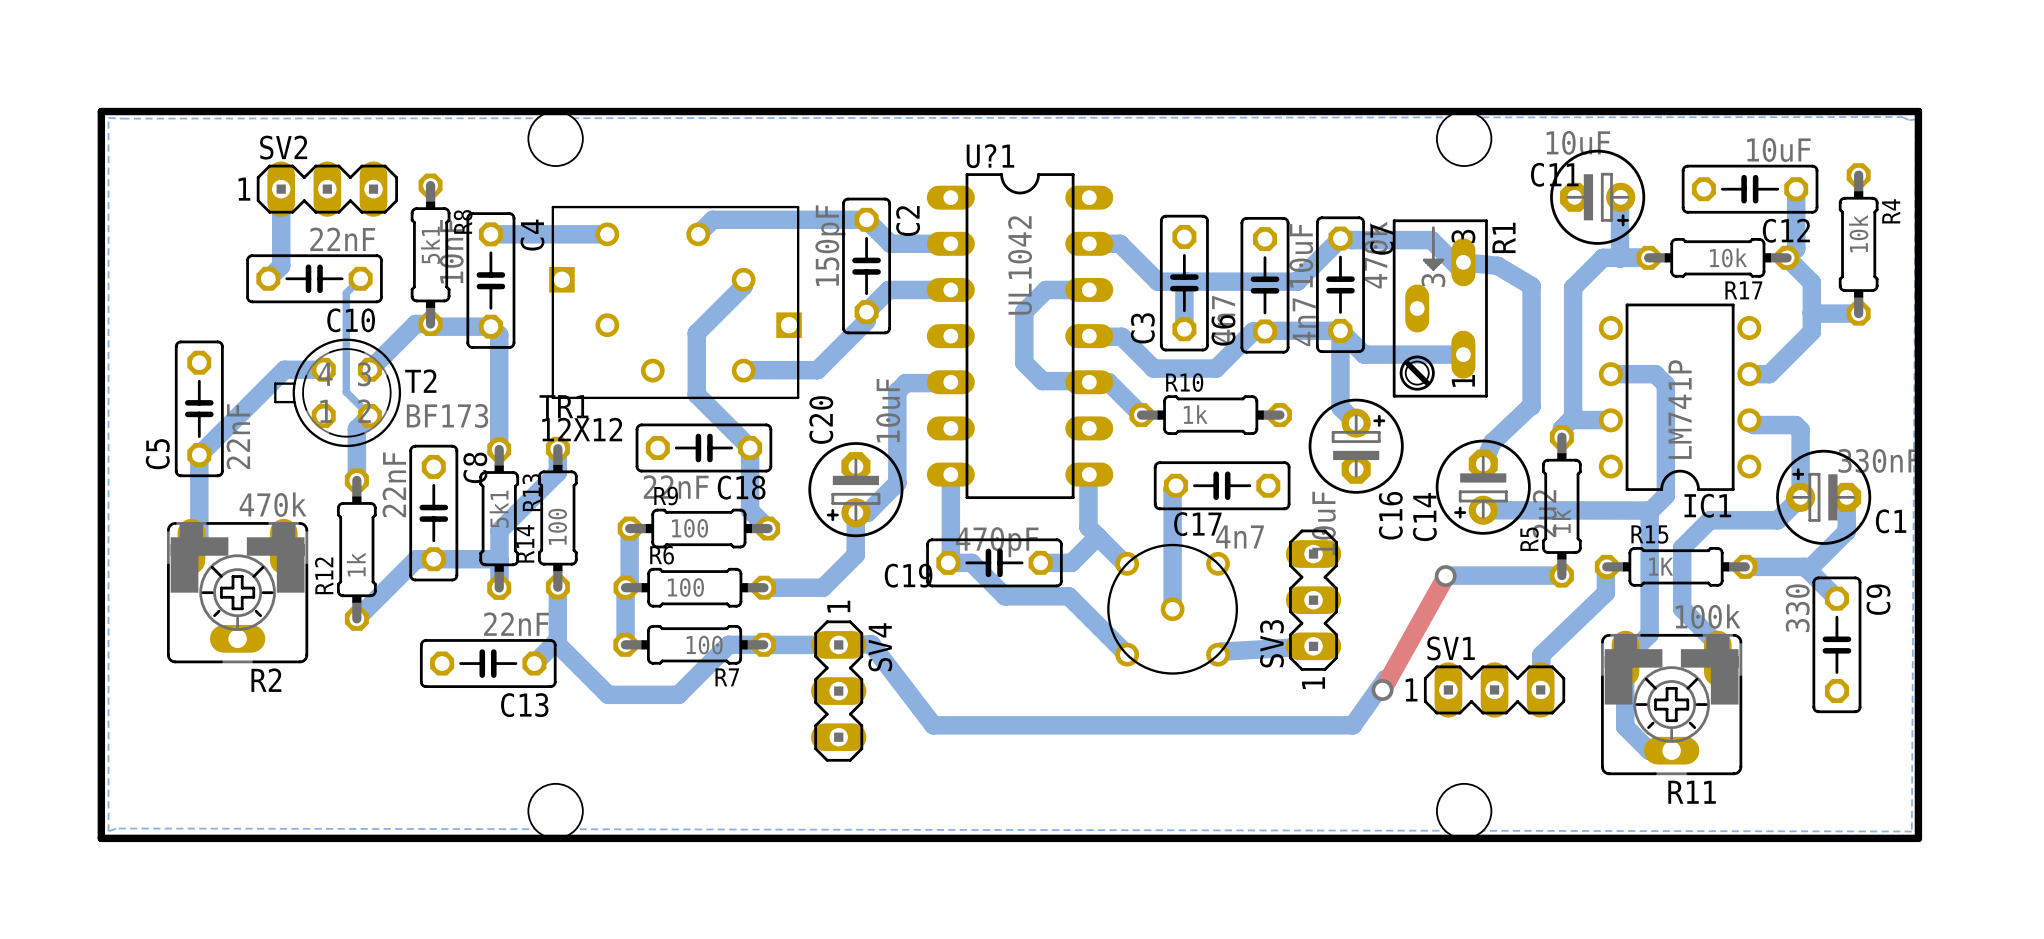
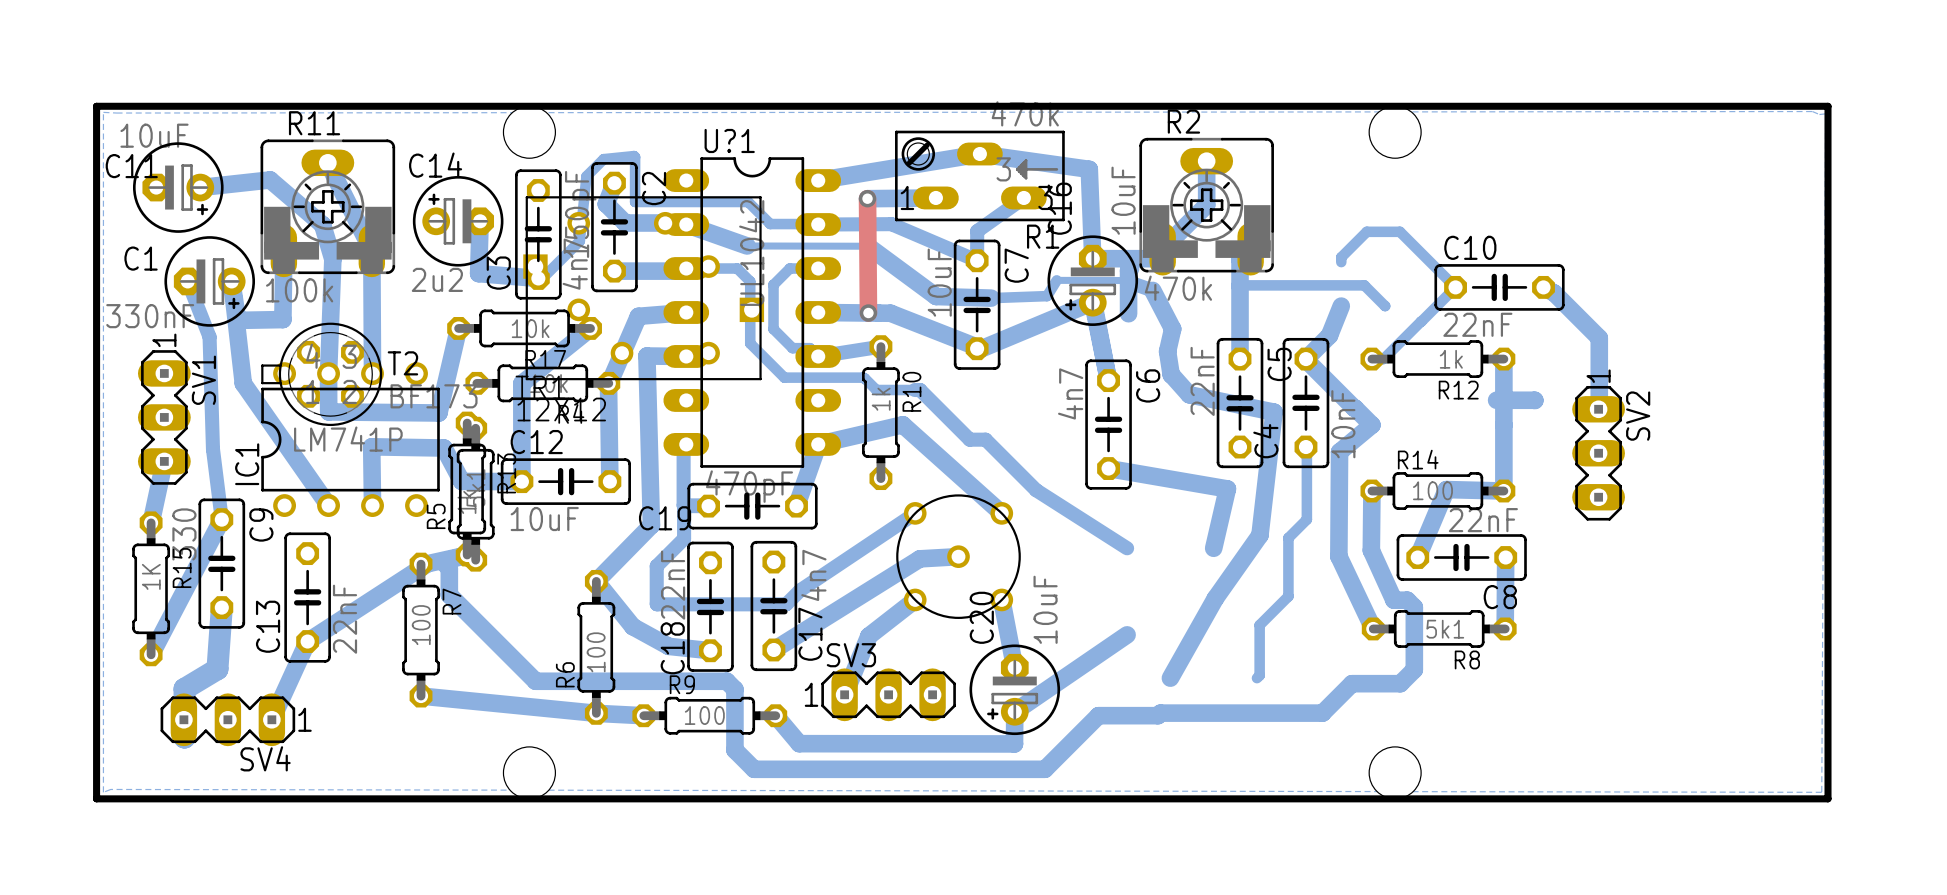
SV2 name position: SV2 (283, 147) -> SV2 (1638, 416)
SV2 footprint: [256, 161, 398, 217] -> [1572, 385, 1625, 521]
bottom track: none -> (1206, 161) (1206, 205) (1153, 258) (1092, 258) (1089, 169) (979, 153) (818, 180)
bottom track: none -> (327, 162) (371, 250) (372, 373)
bottom track: (281, 189) (281, 265) (268, 278) -> none
C12 rotation: 0° (1750, 189) -> 180° (565, 481)
C12 position: (1750, 189) -> (565, 481)
bottom track: (1796, 189) (1796, 248) (1787, 257) (1811, 282) (1811, 331) (1769, 374) (1749, 374) -> none
bottom track: none -> (614, 183) (606, 204) (625, 223) (684, 223) (747, 245) (868, 246) (936, 296) (991, 298) (1047, 296) (1056, 280) (1131, 282) (1152, 290) (1172, 328) (1167, 351) (1171, 374)
bottom track: none -> (200, 187) (270, 179) (322, 224) (332, 259) (328, 411) (438, 413) (458, 328)
C11 position: (1597, 197) -> (178, 187)
bottom track: (1620, 197) (1620, 257) -> none
bottom track: none -> (935, 197) (867, 198)
bottom track: none -> (1023, 197) (977, 231) (977, 260) (891, 224) (770, 224) (748, 201) (635, 201) (634, 156) (603, 159) (586, 176) (579, 241) (542, 278) (478, 273) (480, 221)
top track: none -> (867, 198) (868, 313)
via: none -> (867, 198)
bottom track: (490, 234) (607, 234) -> none
bottom track: (698, 234) (712, 219) (866, 219) (890, 243) (950, 243) -> none
bottom track: (1089, 243) (1119, 243) (1157, 281) (1297, 281) (1340, 238) (1431, 240) (1457, 265) (1463, 262) (1497, 265) (1531, 286) (1531, 406) (1492, 442) (1483, 464) -> none
R4 rotation: 0° (1858, 244) -> 90° clockwise (542, 383)
R4 position: (1858, 244) -> (542, 383)
R8 rotation: 0° (430, 254) -> 90° clockwise (1439, 628)
R8 position: (430, 254) -> (1439, 628)
bottom track: (1648, 257) (1603, 257) (1573, 287) (1573, 417) (1561, 428) (1561, 437) -> none
R17 position: (1717, 257) -> (524, 328)
bottom track: none -> (1250, 249) (1240, 259) (1240, 359)
bottom track: none -> (283, 250) (282, 319) (237, 320) (231, 281) (243, 383) (328, 505)
C2 position: (866, 265) -> (614, 227)
bottom track: none -> (1341, 262) (1341, 257) (1366, 231) (1399, 231) (1455, 287) (1421, 321)
C10 rotation: 0° (314, 278) -> 180° (1499, 287)
C10 position: (314, 278) -> (1499, 287)
bottom track: (360, 278) (346, 293) (346, 392) (369, 415) -> none
bottom track: (743, 279) (743, 286) (696, 333) (696, 394) (750, 447) (750, 510) (768, 528) -> none
C4 rotation: 0° (490, 280) -> 180° (1305, 403)
C4 position: (490, 280) -> (1305, 403)
bottom track: none -> (818, 268) (789, 268) (773, 284) (773, 329) (792, 348) (809, 348) (818, 356) (880, 346)
C3 position: (1184, 283) -> (538, 234)
bottom track: none -> (614, 271) (737, 268) (750, 281) (750, 343) (784, 377) (863, 377) (876, 390) (920, 390) (969, 439) (985, 439) (1036, 490) (1127, 548)
C7 position: (1340, 284) -> (977, 304)
C6 rotation: 0° (1264, 285) -> 180° (1108, 424)
C6 position: (1264, 285) -> (1108, 424)
bottom track: (950, 289) (888, 289) (866, 312) (866, 321) (817, 370) (743, 370) -> none
bottom track: (1089, 289) (1046, 289) (1024, 311) (1024, 362) (1042, 381) (1108, 382) (1141, 415) -> none
bottom track: none -> (187, 281) (209, 336) (212, 449) (221, 519) (151, 654)
bottom track: none -> (1240, 285) (1364, 285) (1385, 306)
bottom track: none -> (1543, 287) (1554, 293) (1599, 338) (1598, 409)
R1 rotation: 0° (1440, 308) -> 90° clockwise (979, 175)
R1 position: (1440, 308) -> (979, 175)
bottom track: (1811, 313) (1858, 313) -> none
bottom track: none -> (1092, 302) (1108, 380) (1093, 302) (980, 349) (890, 313) (818, 312)
bottom track: none -> (1341, 306) (1329, 335) (1305, 359) (1371, 425) (1339, 451) (1338, 556) (1373, 628)
bottom track: none -> (686, 312) (638, 316) (608, 385) (609, 481)
via: none -> (868, 313)
bottom track: (1340, 330) (1364, 354) (1463, 354) -> none
bottom track: (1340, 330) (1340, 407) (1356, 423) -> none
bottom track: (1340, 330) (1253, 331) (1216, 368) (1153, 368) (1121, 336) (1089, 336) -> none
U?1 position: (1020, 336) -> (752, 312)
bottom track: none -> (1420, 321) (1383, 359) (1371, 359)
bottom track: none -> (590, 328) (521, 383) (521, 481) (461, 481) (443, 448) (371, 446) (372, 505)
bottom track: (323, 369) (284, 369) (199, 455) (199, 538) (191, 546) -> none
bottom track: (369, 369) (415, 324) (430, 324) (433, 326) (490, 326) (499, 334) (499, 449) -> none
bottom track: none -> (686, 356) (646, 356) (651, 525) (596, 581) (632, 626) (668, 646) (710, 650)
bottom track: (1610, 374) (1655, 374) (1665, 384) (1665, 495) (1649, 511) -> none
bottom track: none -> (1503, 359) (1503, 491) (1446, 489) (1417, 557)
bottom track: (950, 382) (905, 383) (897, 391) (897, 483) (867, 512) (855, 512) -> none
bottom track: none -> (1171, 374) (1189, 394) (1274, 412) (1259, 535) (1215, 598) (1170, 678)
IC1 rotation: 0° (1680, 397) -> 90° clockwise (350, 439)
IC1 position: (1680, 397) -> (350, 439)
C5 rotation: 0° (199, 408) -> 180° (1240, 403)
C5 position: (199, 408) -> (1240, 403)
bottom track: (369, 415) (356, 429) (356, 480) -> none
R10 rotation: 0° (1210, 415) -> 90° clockwise (880, 412)
R10 position: (1210, 415) -> (880, 412)
bottom track: (1749, 420) (1754, 425) (1795, 425) (1800, 430) (1800, 497) (1777, 520) (1709, 520) (1682, 547) (1682, 608) (1717, 644) (1717, 658) -> none
C16 rotation: 0° (1356, 446) -> 180° (1092, 280)
C16 position: (1356, 446) -> (1092, 280)
C18 rotation: 0° (703, 447) -> 90° clockwise (710, 606)
C18 position: (703, 447) -> (710, 606)
bottom track: (557, 448) (557, 472) (499, 530) (499, 587) -> none
bottom track: none -> (686, 444) (683, 444) (683, 505) (708, 506) (684, 506) (684, 538) (656, 566) (657, 604) (786, 604) (800, 590) (915, 513)
bottom track: none -> (1305, 447) (1306, 519) (1288, 537) (1288, 596) (1259, 625) (1259, 675) (1256, 678)
bottom track: (950, 474) (950, 560) (948, 562) (971, 562) (1005, 596) (1068, 596) (1127, 654) -> none
bottom track: (1089, 474) (1088, 527) (1127, 563) -> none
bottom track: none -> (164, 461) (151, 522)
bottom track: (1176, 485) (1172, 489) (1172, 609) -> none
C17 rotation: 0° (1222, 485) -> 90° counterclockwise (773, 606)
C17 position: (1222, 485) -> (773, 606)
C14 rotation: 0° (1483, 487) -> 90° clockwise (458, 221)
C14 position: (1483, 487) -> (458, 221)
C20 position: (855, 489) -> (1014, 689)
bottom track: none -> (1108, 468) (1227, 488) (1213, 548)
C1 rotation: 0° (1823, 497) -> 180° (209, 281)
C1 position: (1823, 497) -> (209, 281)
bottom track: (1846, 497) (1846, 531) (1808, 569) -> none
R5 position: (1561, 506) -> (467, 489)
bottom track: (1483, 510) (1649, 511) -> none
bottom track: (1649, 511) (1649, 634) (1625, 658) (1625, 726) (1649, 750) (1671, 750) -> none
bottom track: (855, 512) (855, 555) (823, 587) (764, 587) -> none
C8 rotation: 0° (433, 513) -> 90° clockwise (1461, 557)
C8 position: (433, 513) -> (1461, 557)
bottom track: none -> (1371, 491) (1371, 550) (1393, 600) (1407, 600) (1414, 607) (1414, 669) (1400, 683) (1352, 683) (1322, 713) (1160, 713) (1157, 715) (1098, 715) (1044, 769) (754, 769) (734, 750) (734, 689) (726, 681) (535, 681) (449, 594) (449, 568) (442, 561) (467, 554) (427, 563)
R14 rotation: 0° (557, 517) -> 90° clockwise (1437, 491)
R14 position: (557, 517) -> (1437, 491)
bottom track: (629, 528) (629, 583) (625, 587) (625, 644) -> none
R9 position: (698, 528) -> (709, 715)
bottom track: none -> (796, 506) (818, 444) (902, 424) (1001, 513)
bottom track: (1097, 536) (1071, 562) (1040, 562) -> none
R12 rotation: 0° (356, 549) -> 90° clockwise (1437, 359)
R12 position: (356, 549) -> (1437, 359)
R6 name position: R6 (662, 555) -> R6 (565, 674)
bottom track: (499, 560) (416, 559) (356, 618) -> none
C19 position: (994, 562) -> (752, 506)
bottom track: (1606, 566) (1605, 593) (1541, 654) (1540, 689) -> none
R15 rotation: 0° (1676, 566) -> 90° clockwise (151, 588)
R15 position: (1676, 566) -> (151, 588)
bottom track: (1745, 566) (1805, 566) (1836, 598) -> none
R12 name position: R12 (324, 575) -> R12 (1458, 390)
bottom track: (1561, 575) (1445, 576) -> none
top track: (1445, 576) (1382, 690) -> none
via: (1445, 576) -> none
bottom track: none -> (958, 556) (919, 558) (773, 649)
bottom track: none -> (1505, 557) (1505, 628)
bottom track: (557, 587) (557, 640) (534, 663) -> none
R6 rotation: 0° (694, 587) -> 90° clockwise (596, 647)
R6 position: (694, 587) -> (596, 647)
R2 rotation: 0° (237, 591) -> 180° (1206, 206)
R2 position: (237, 591) -> (1206, 206)
bottom track: none -> (427, 563) (307, 641) (271, 719)
SV3 rotation: 0° (1313, 600) -> 90° clockwise (888, 694)
SV3 position: (1313, 600) -> (888, 694)
part position: (1172, 609) -> (958, 556)
bottom track: none -> (915, 599) (868, 636) (844, 694)
bottom track: none -> (1001, 599) (1014, 667)
bottom track: none -> (221, 607) (217, 669) (184, 688) (184, 737) (183, 719)
bottom track: (555, 642) (608, 694) (678, 694) (728, 644) (871, 644) (933, 725) (1352, 725) (1385, 679) (1382, 690) -> none
R7 rotation: 0° (694, 644) -> 90° clockwise (421, 630)
R7 position: (694, 644) -> (421, 630)
C9 position: (1836, 644) -> (221, 563)
bottom track: (1313, 646) (1220, 651) (1218, 654) -> none
SV1 name position: SV1 (1451, 648) -> SV1 (203, 380)
SV1 footprint: [1423, 662, 1566, 718] -> [137, 350, 191, 485]
C13 rotation: 0° (488, 663) -> 90° clockwise (307, 597)
C13 position: (488, 663) -> (307, 597)
bottom track: none -> (1127, 634) (1014, 711) (1014, 743) (799, 743) (775, 715)
R7 name position: R7 (727, 677) -> R7 (452, 601)
via: (1382, 690) -> none
SV4 rotation: 0° (838, 691) -> 90° clockwise (227, 719)
SV4 position: (838, 691) -> (227, 719)
R11 rotation: 0° (1671, 702) -> 180° (327, 208)
R11 position: (1671, 702) -> (327, 208)
bottom track: none -> (421, 696) (596, 713) (643, 715)

